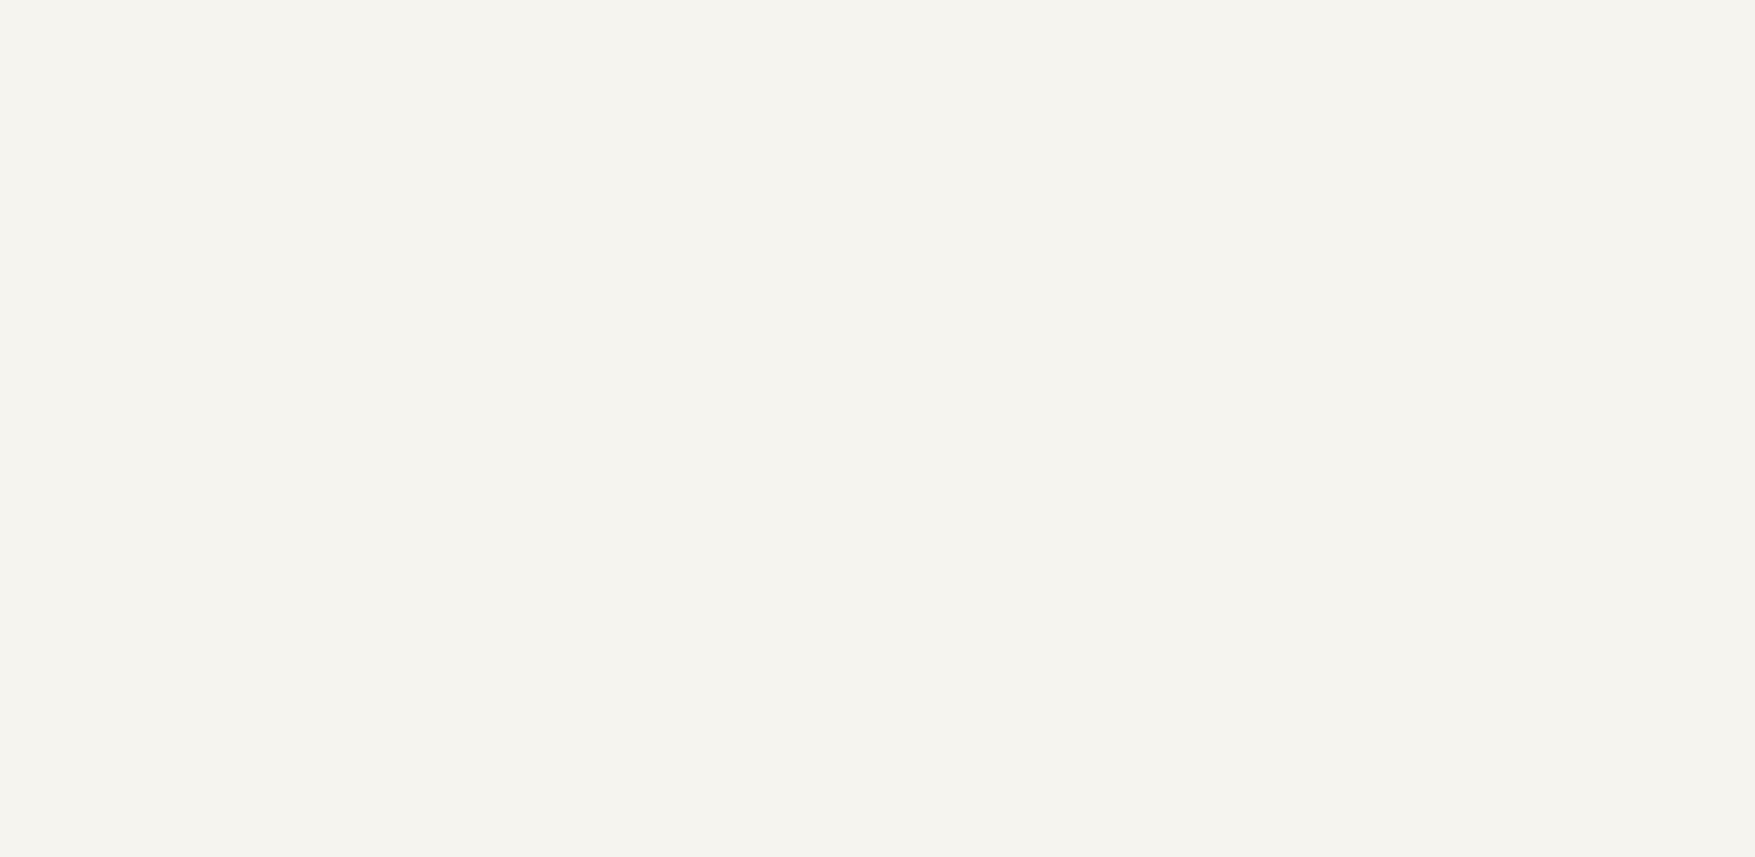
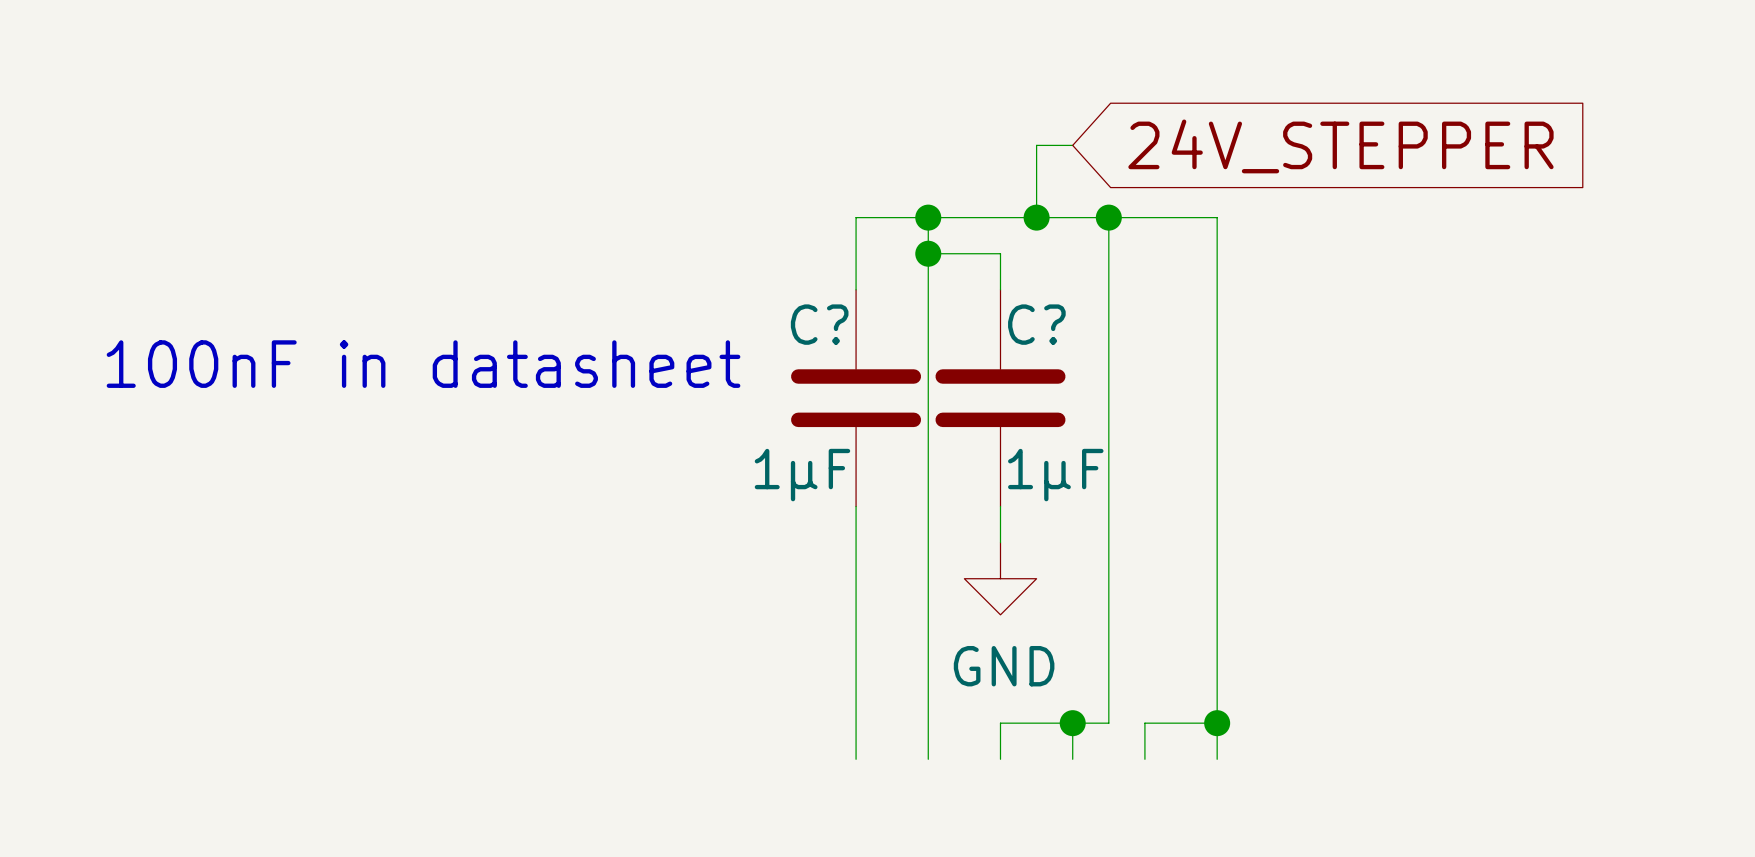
wire: none -> (1072, 145) (1036, 145) (1036, 217)
global label: none -> 24V_STEPPER (1340, 146)
wire: none -> (928, 217) (928, 759)
junction: none -> (928, 217)
junction: none -> (1036, 217)
wire: none -> (1108, 217) (1108, 723) (1000, 723) (1000, 759)
junction: none -> (1108, 217)
wire: none -> (928, 253) (1000, 253) (1000, 289)
junction: none -> (928, 253)
wire: none -> (856, 289) (856, 217) (1217, 217) (1217, 759)
text: none -> 100nF in datasheet (423, 364)
C?: none -> 1μF (856, 398)
C?: none -> 1μF (1000, 398)
wire: none -> (856, 506) (856, 759)
wire: none -> (1000, 506) (1000, 542)
power symbol: none -> GND (1000, 578)
wire: none -> (1072, 723) (1072, 759)
junction: none -> (1072, 723)
wire: none -> (1217, 723) (1144, 723) (1144, 759)
junction: none -> (1217, 723)

